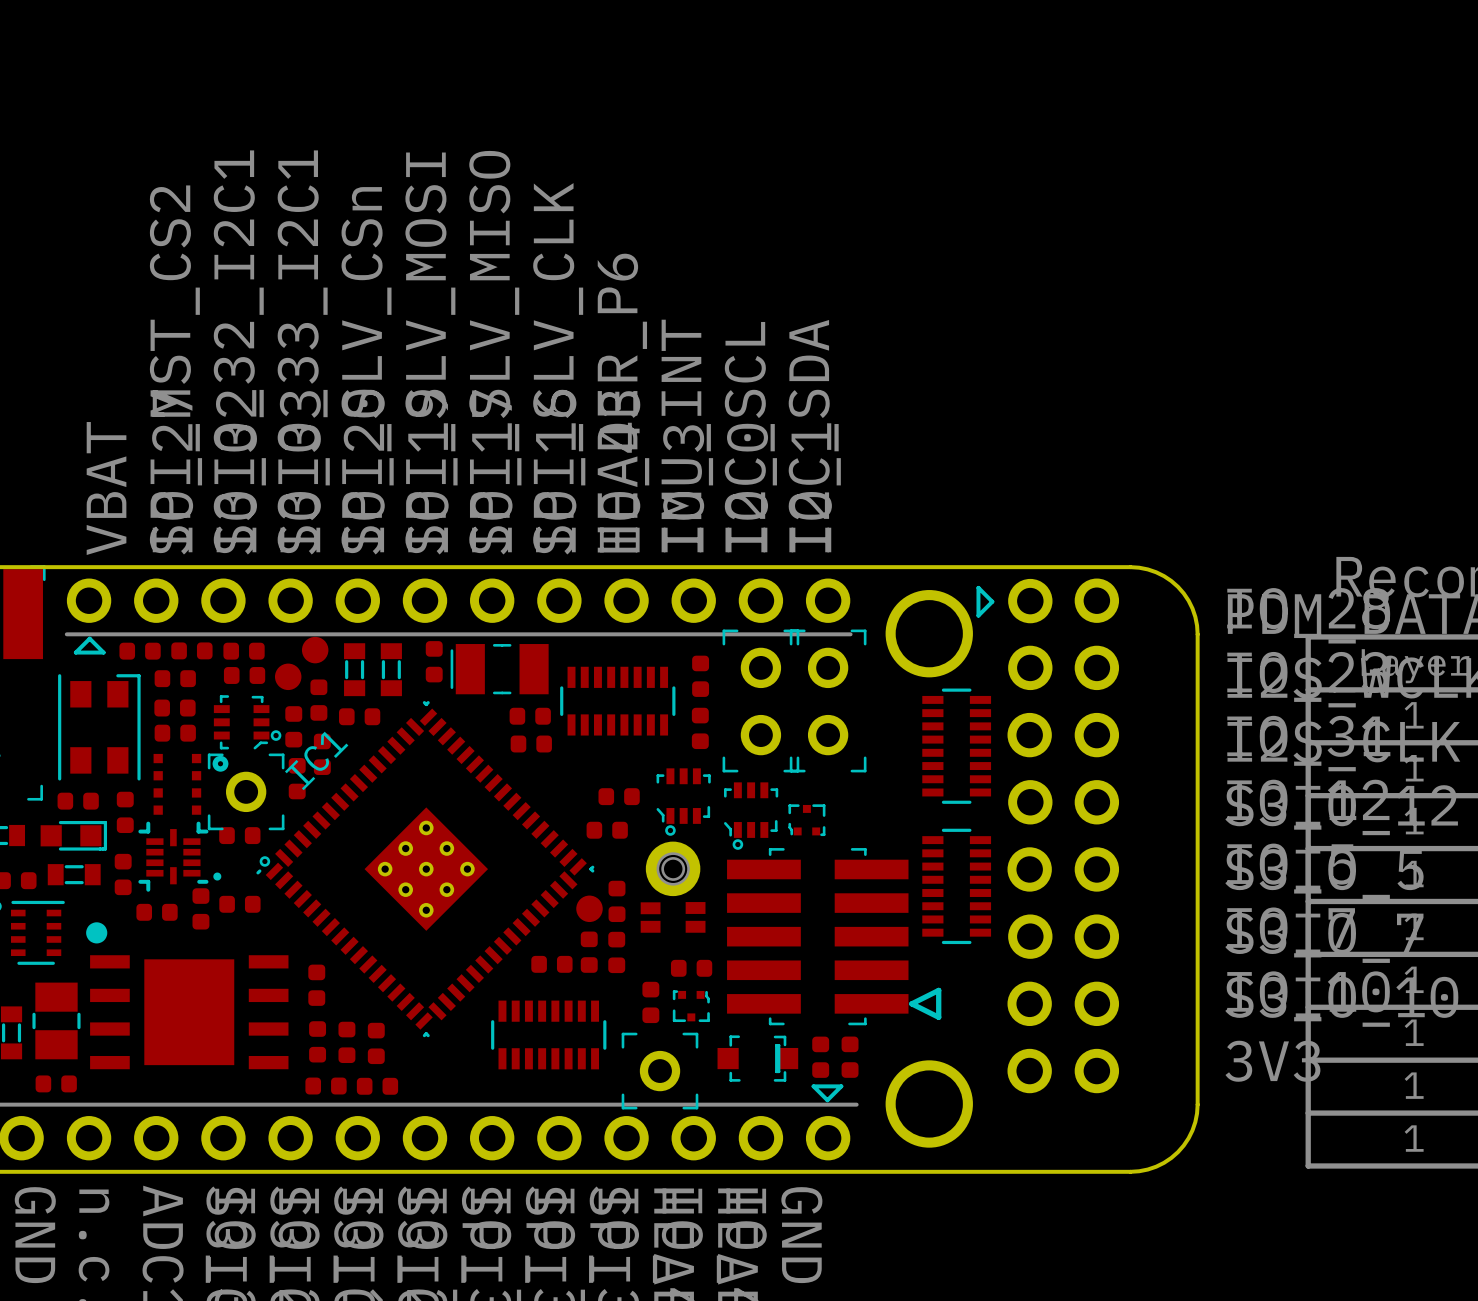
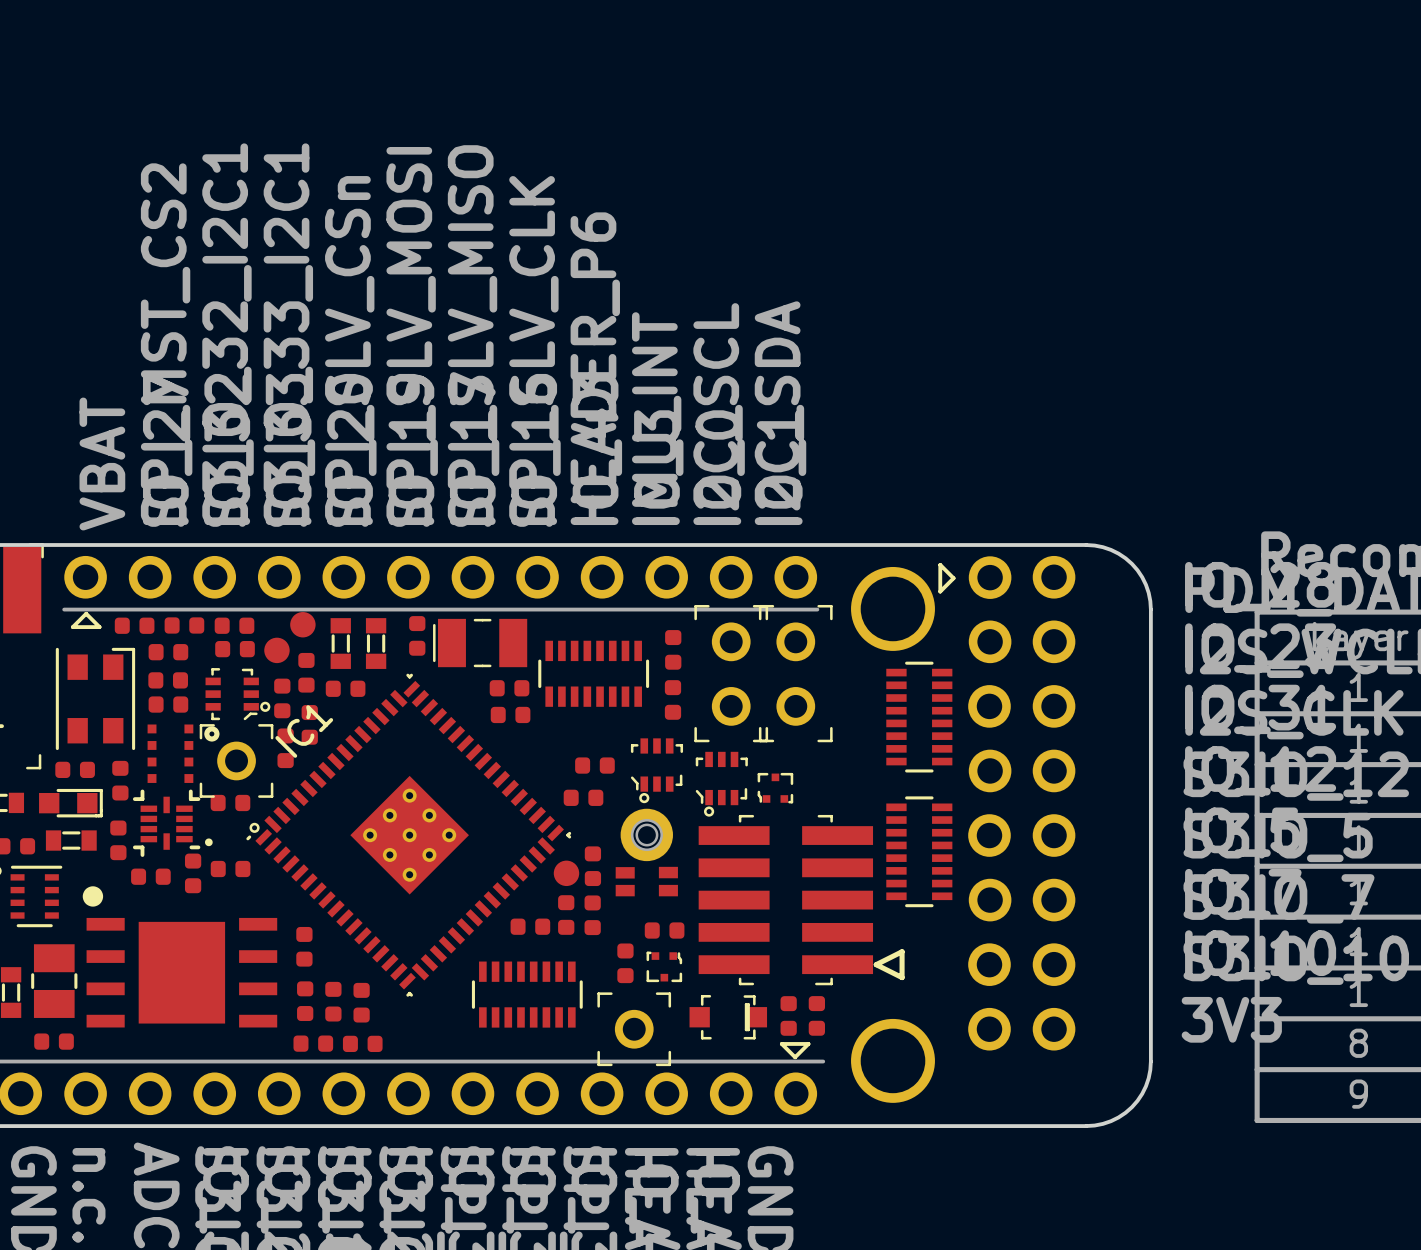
text: 1 (1414, 1085) -> 8 (1358, 1043)
text: 1 (1414, 1138) -> 9 (1358, 1094)

